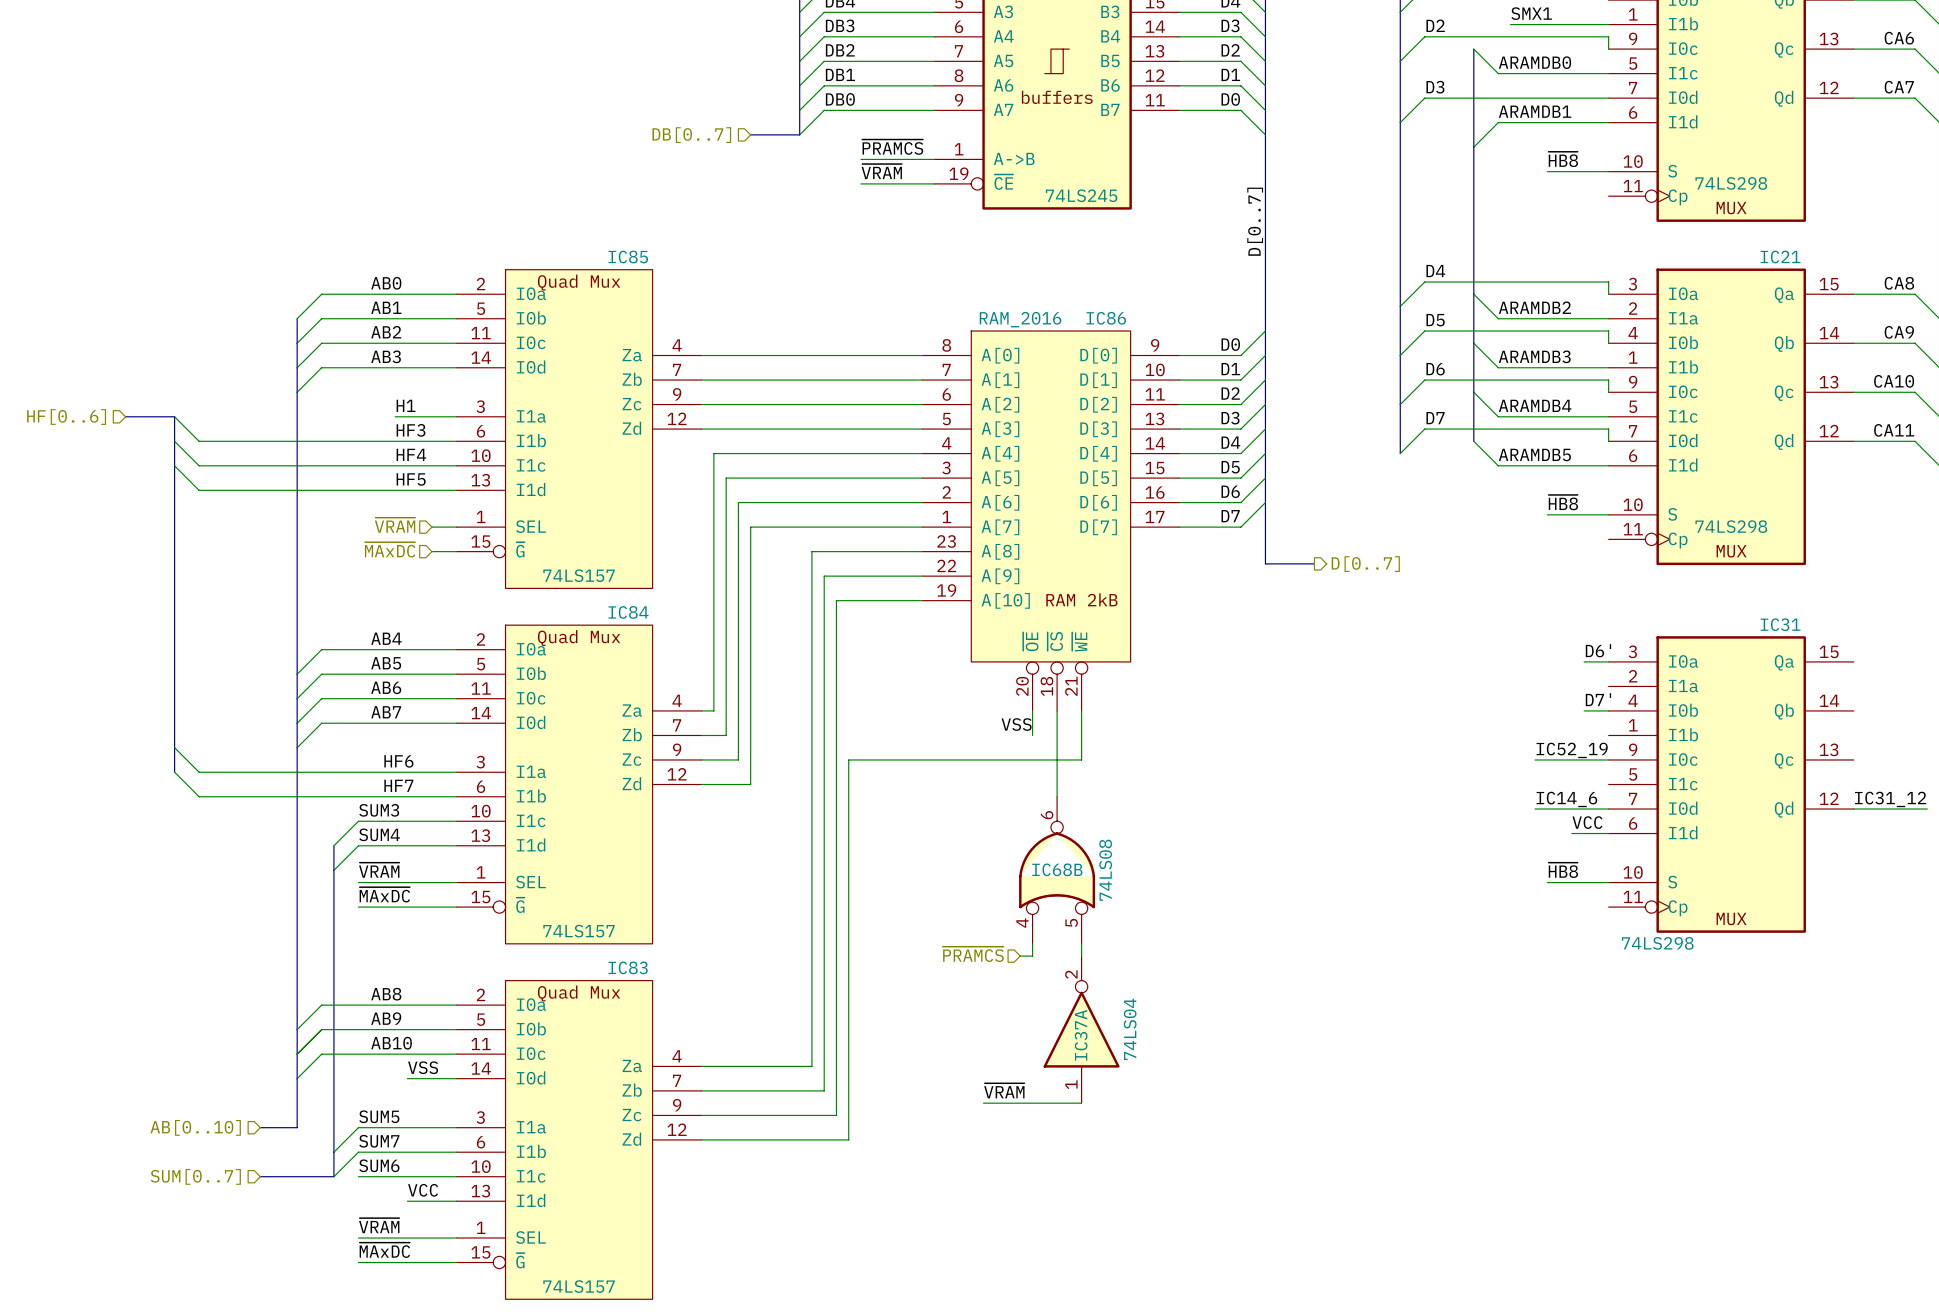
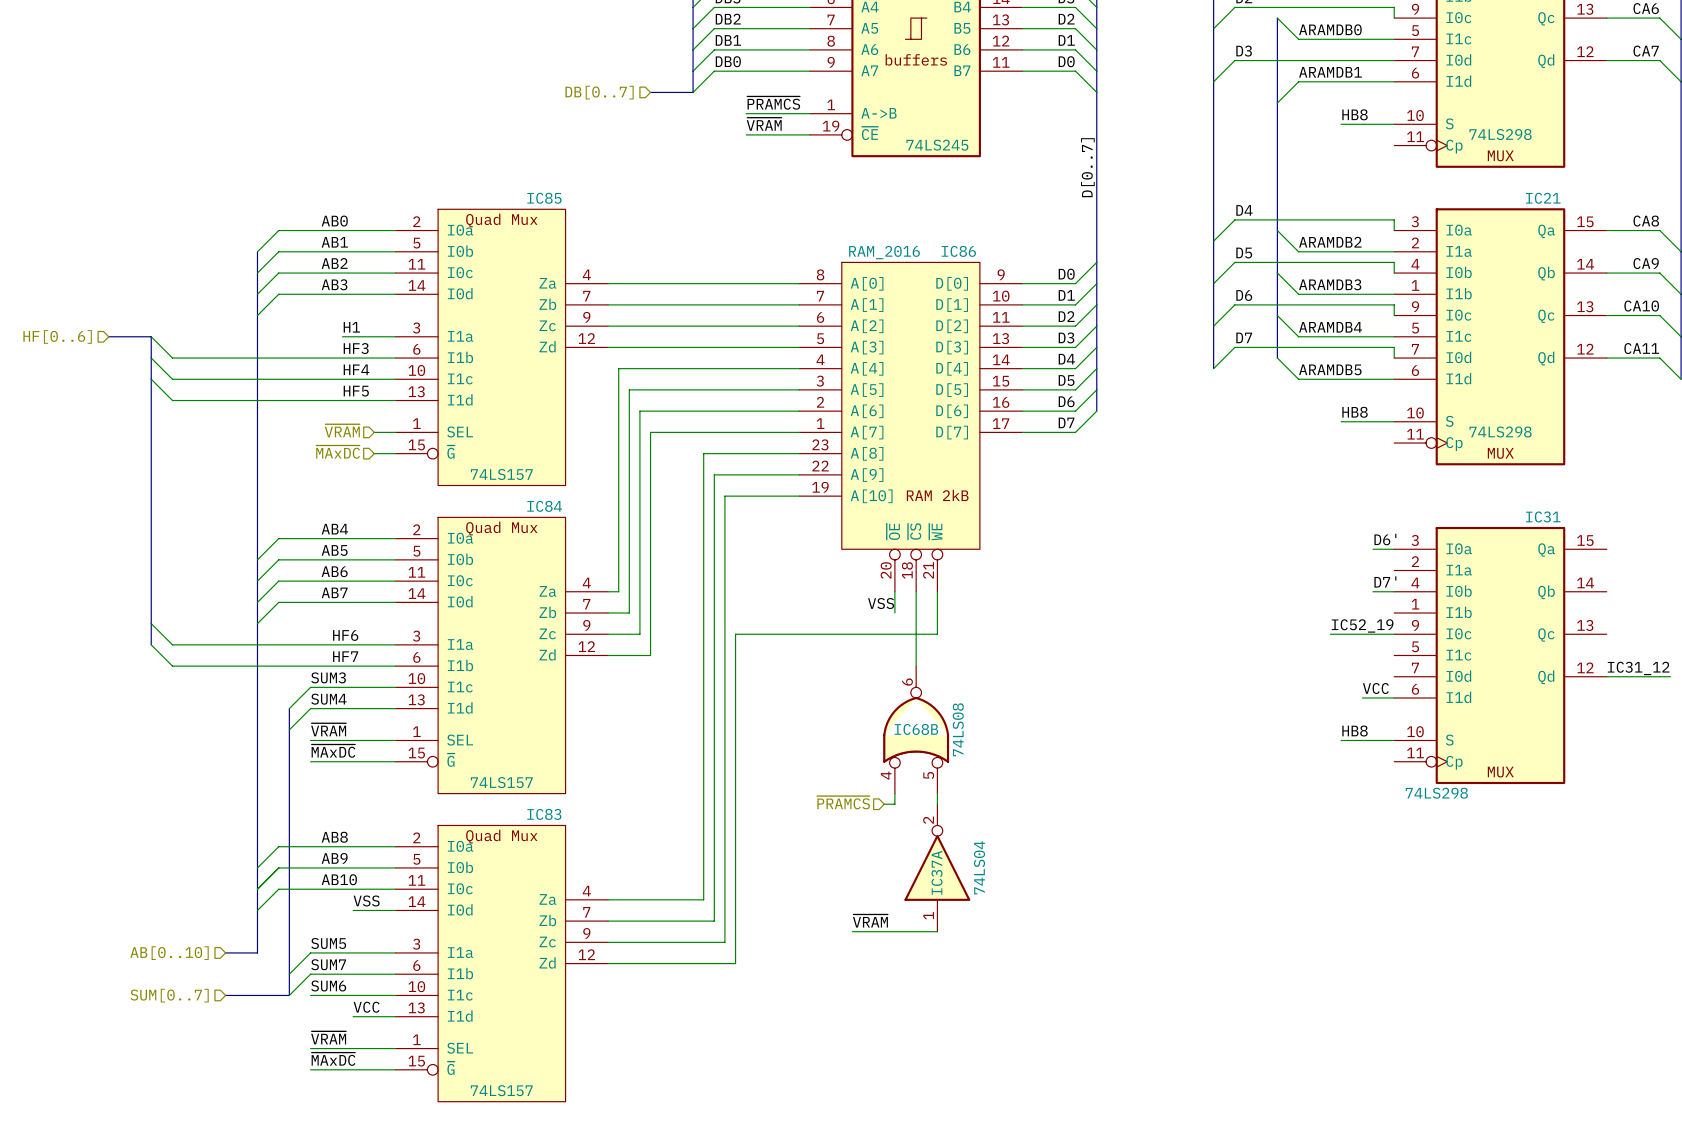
label: ~{HB8} (1563, 159) -> HB8 (1355, 114)
bus: (1265, 502) (1265, 563) (1314, 563) -> none
label: ~{HB8} (1563, 502) -> HB8 (1355, 412)
hierarchical label: D[0..7] (1365, 564) -> none
label: IC14_6 (1566, 799) -> none
wire: (1535, 809) (1608, 809) -> none
label: ~{HB8} (1563, 870) -> HB8 (1355, 731)

